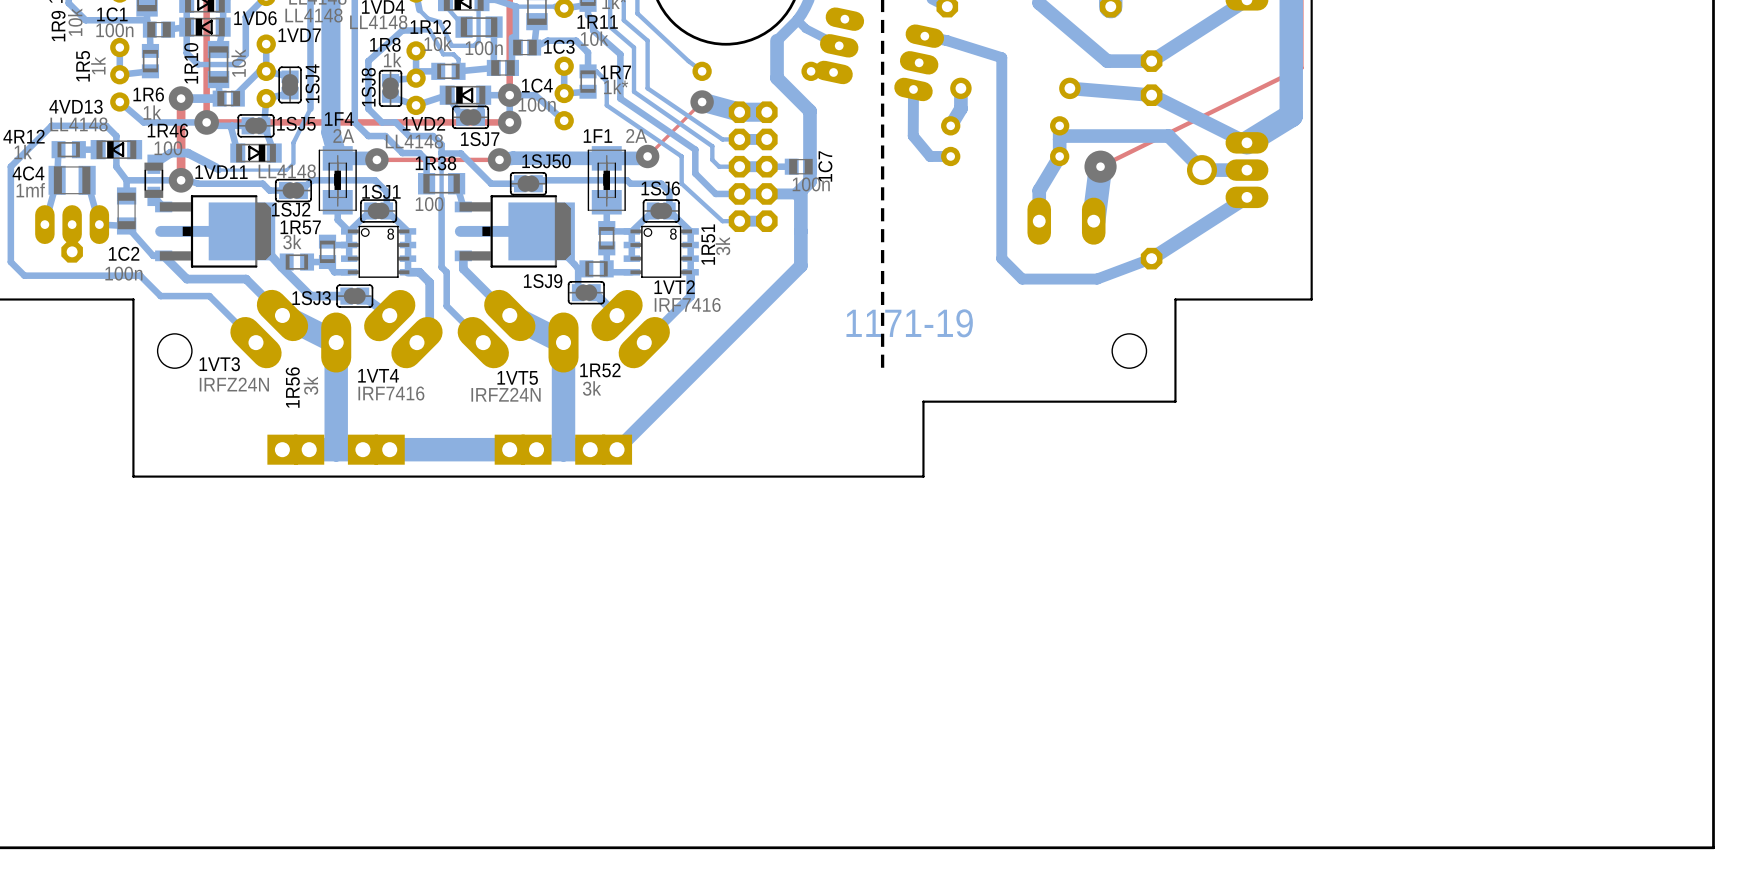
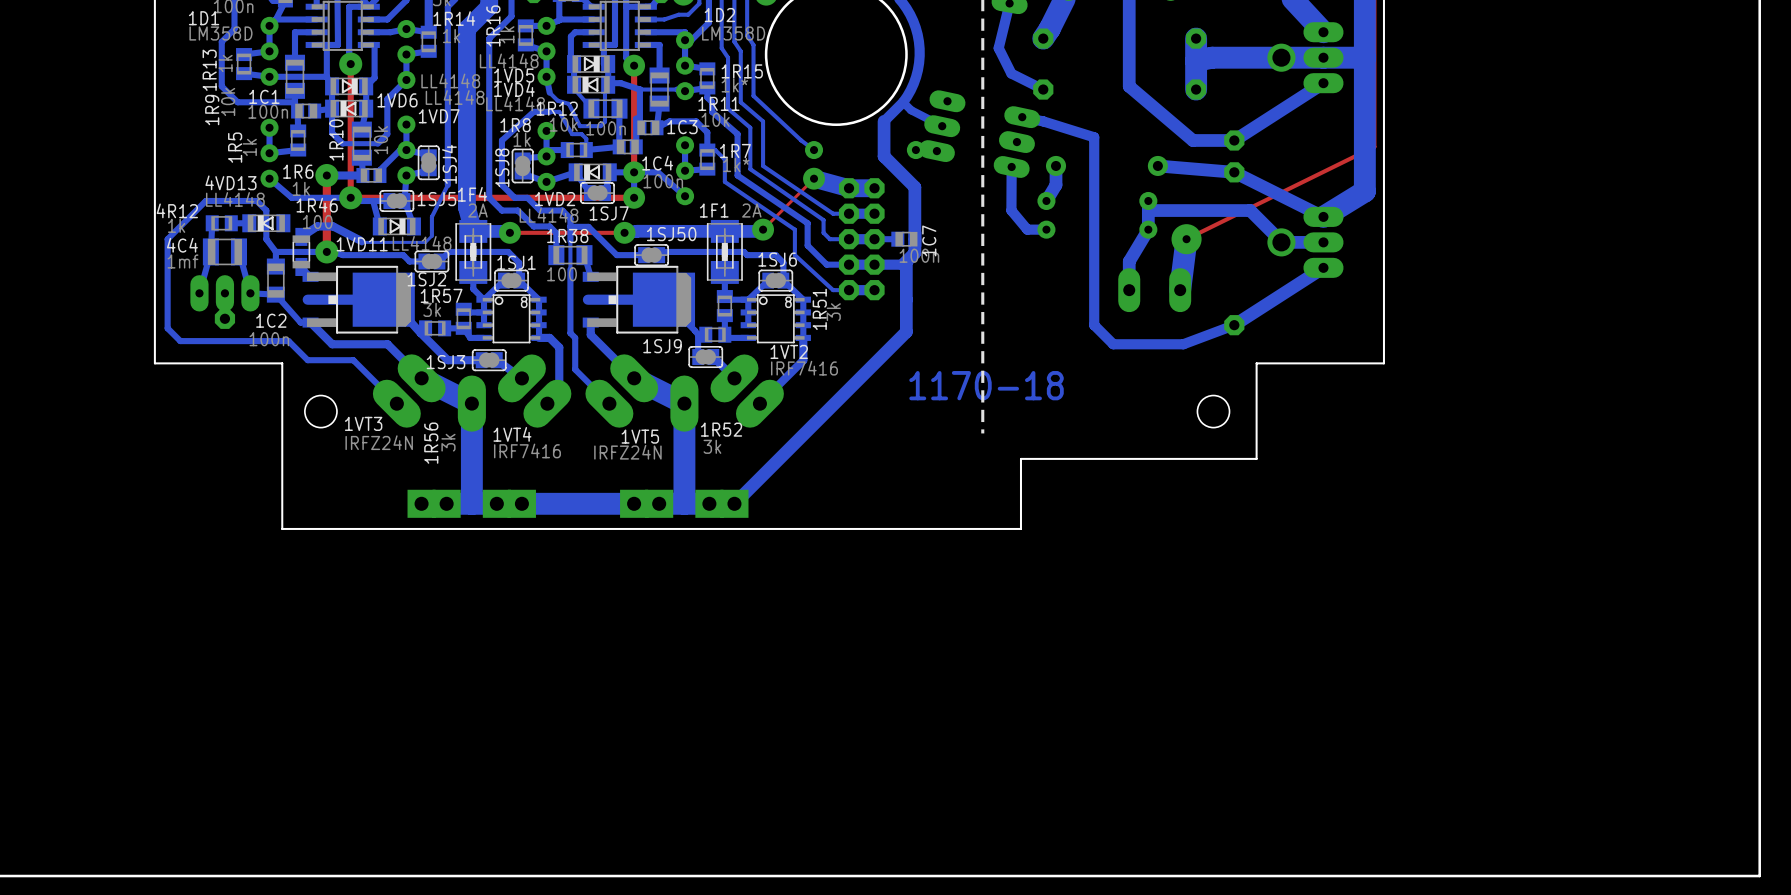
text: 1171-19 (909, 323) -> 1170-18 (986, 385)

